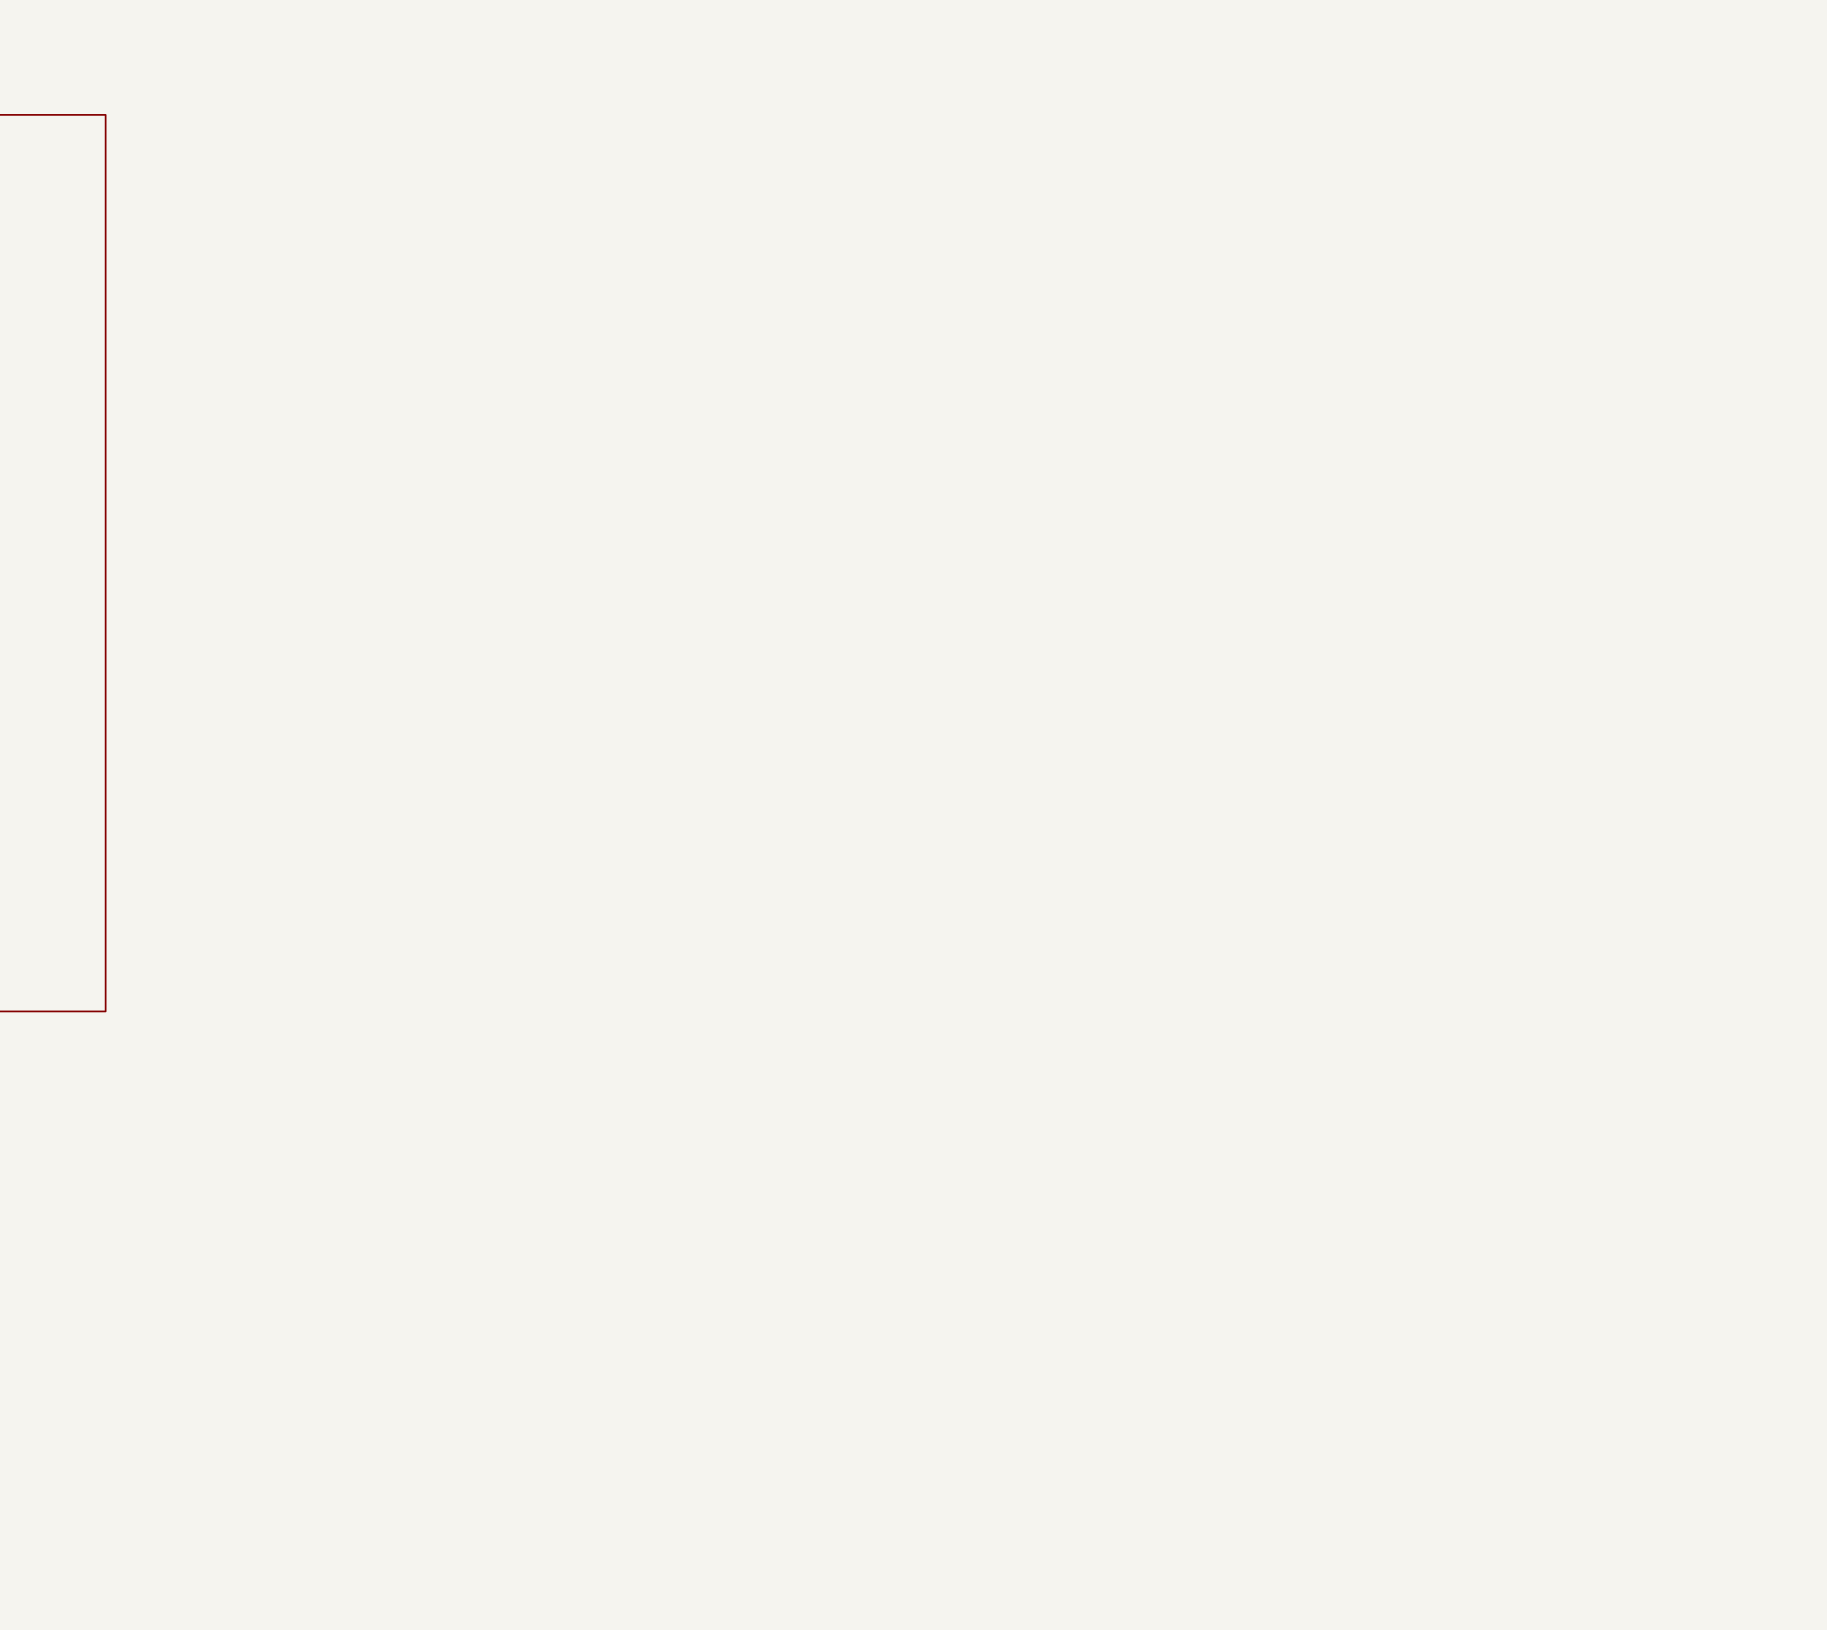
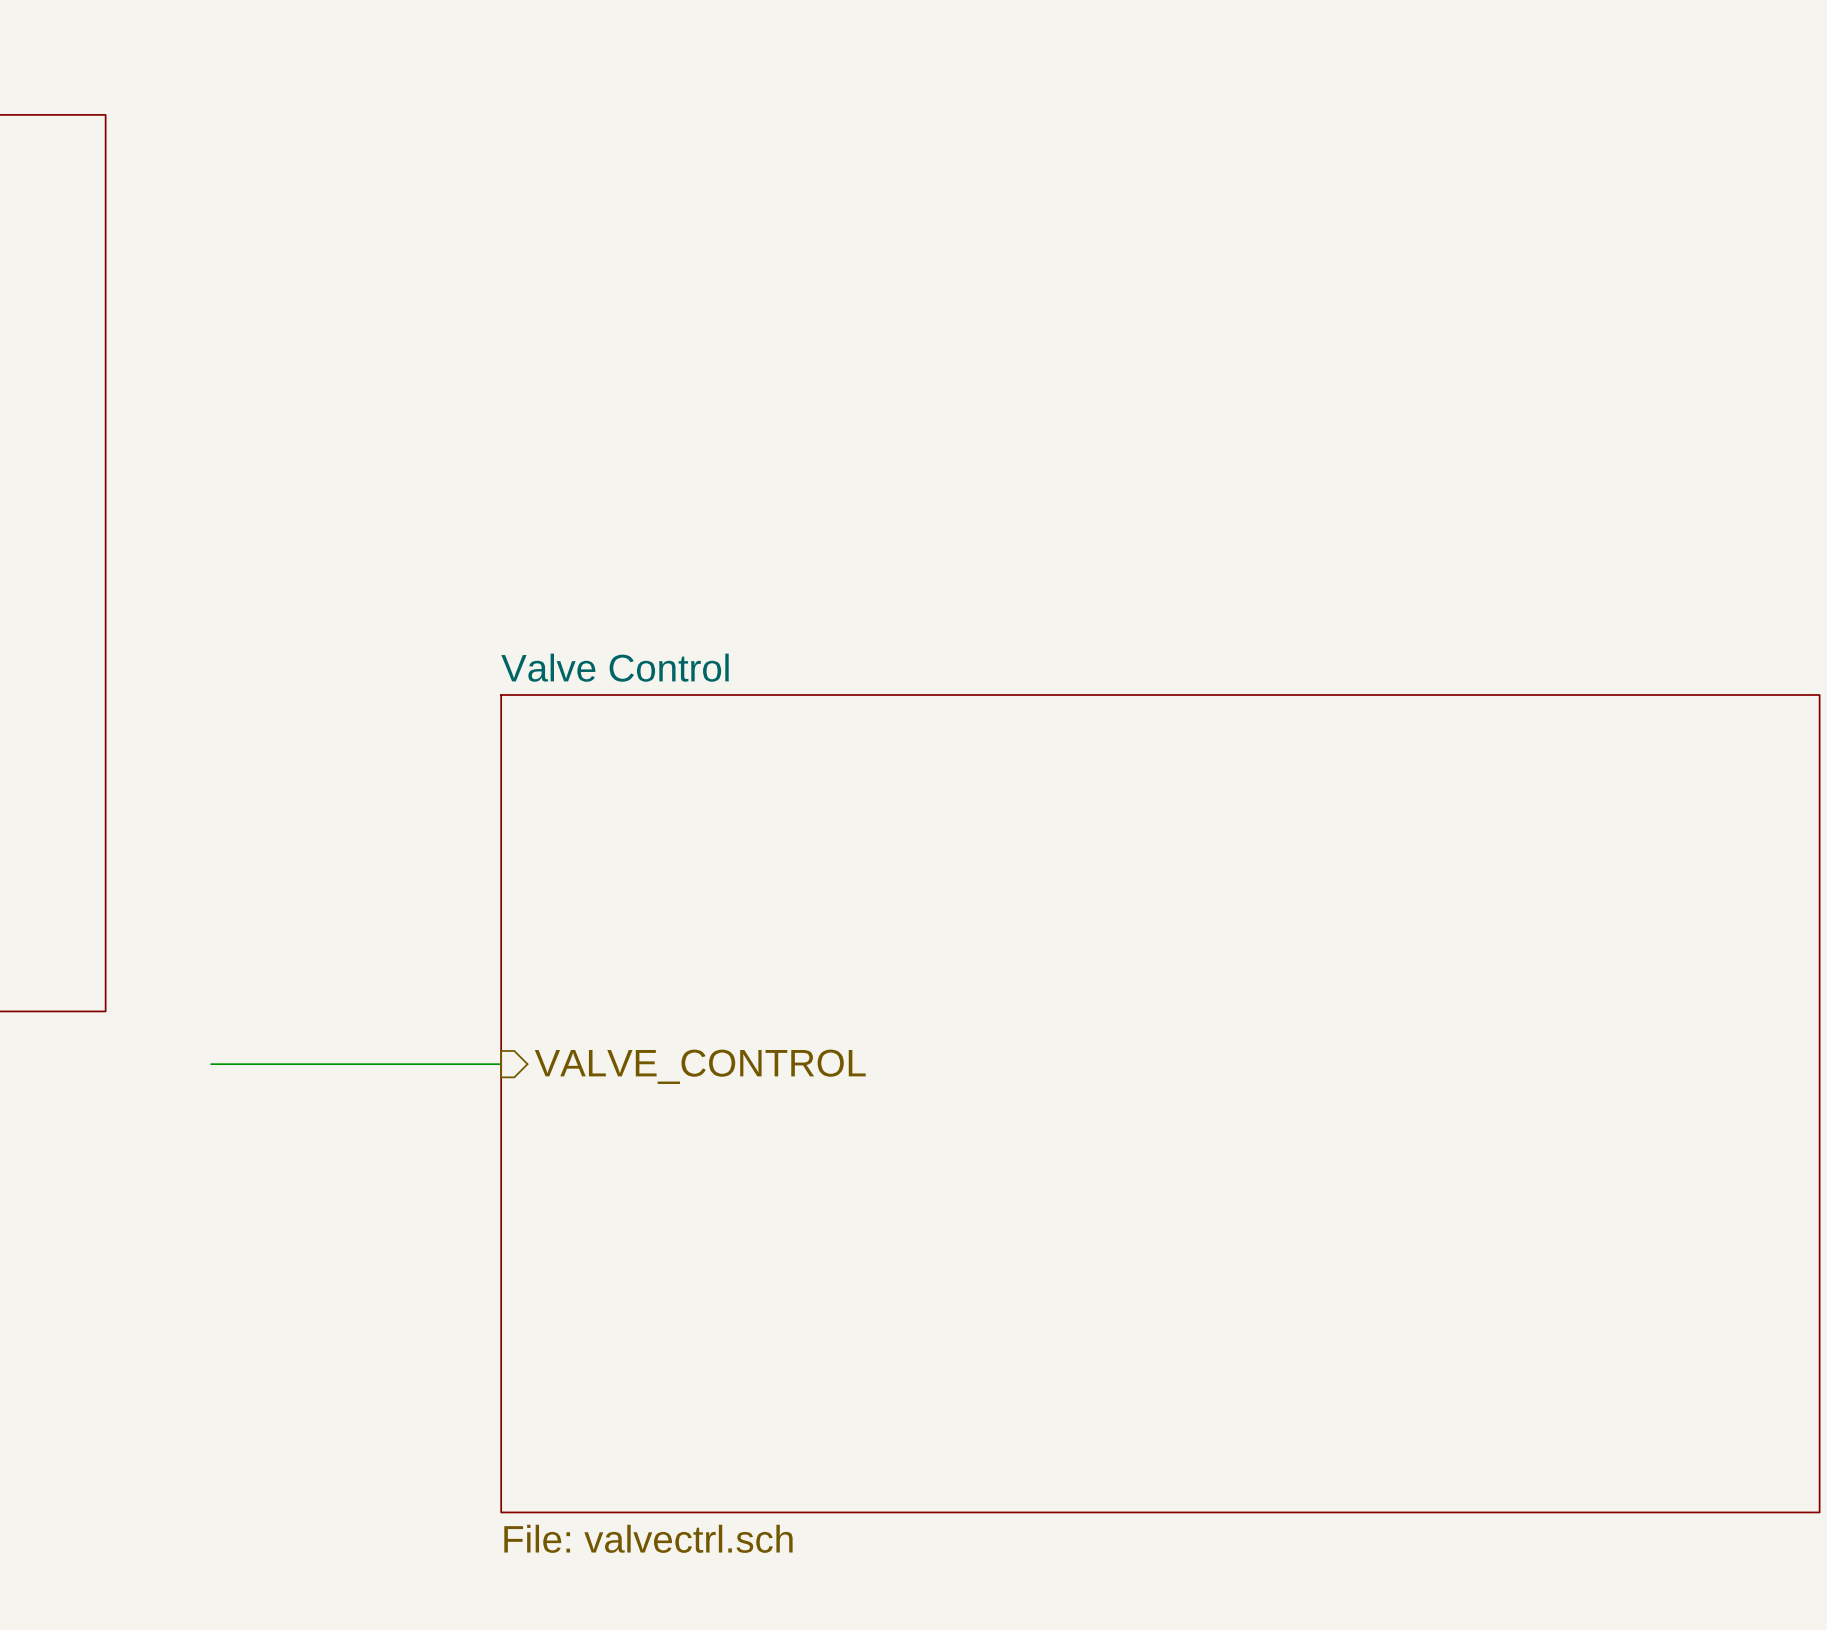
wire: none -> (211, 1064) (501, 1064)
hierarchical label: none -> VALVE_CONTROL (700, 1066)
sheet Valve Control: none -> File: valvectrl.sch (1160, 1103)

